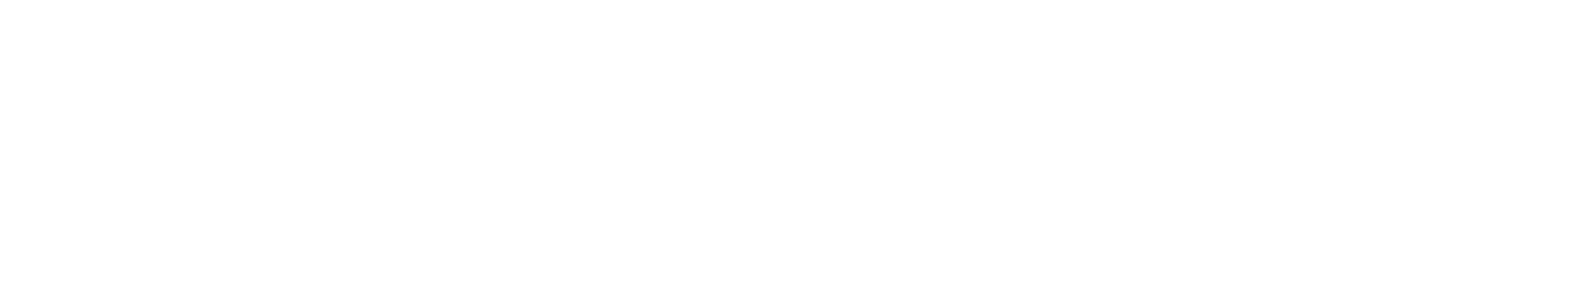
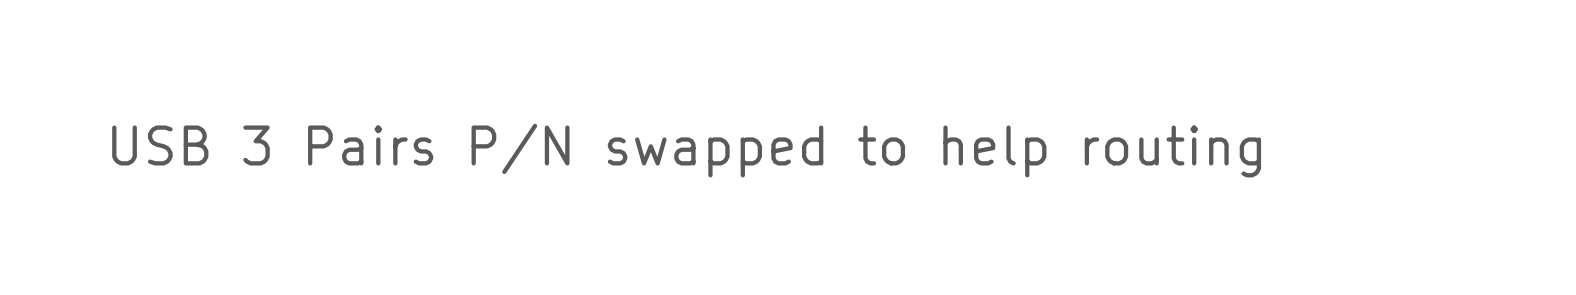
text: none -> USB 3 Pairs P/N swapped to help routing (686, 150)

